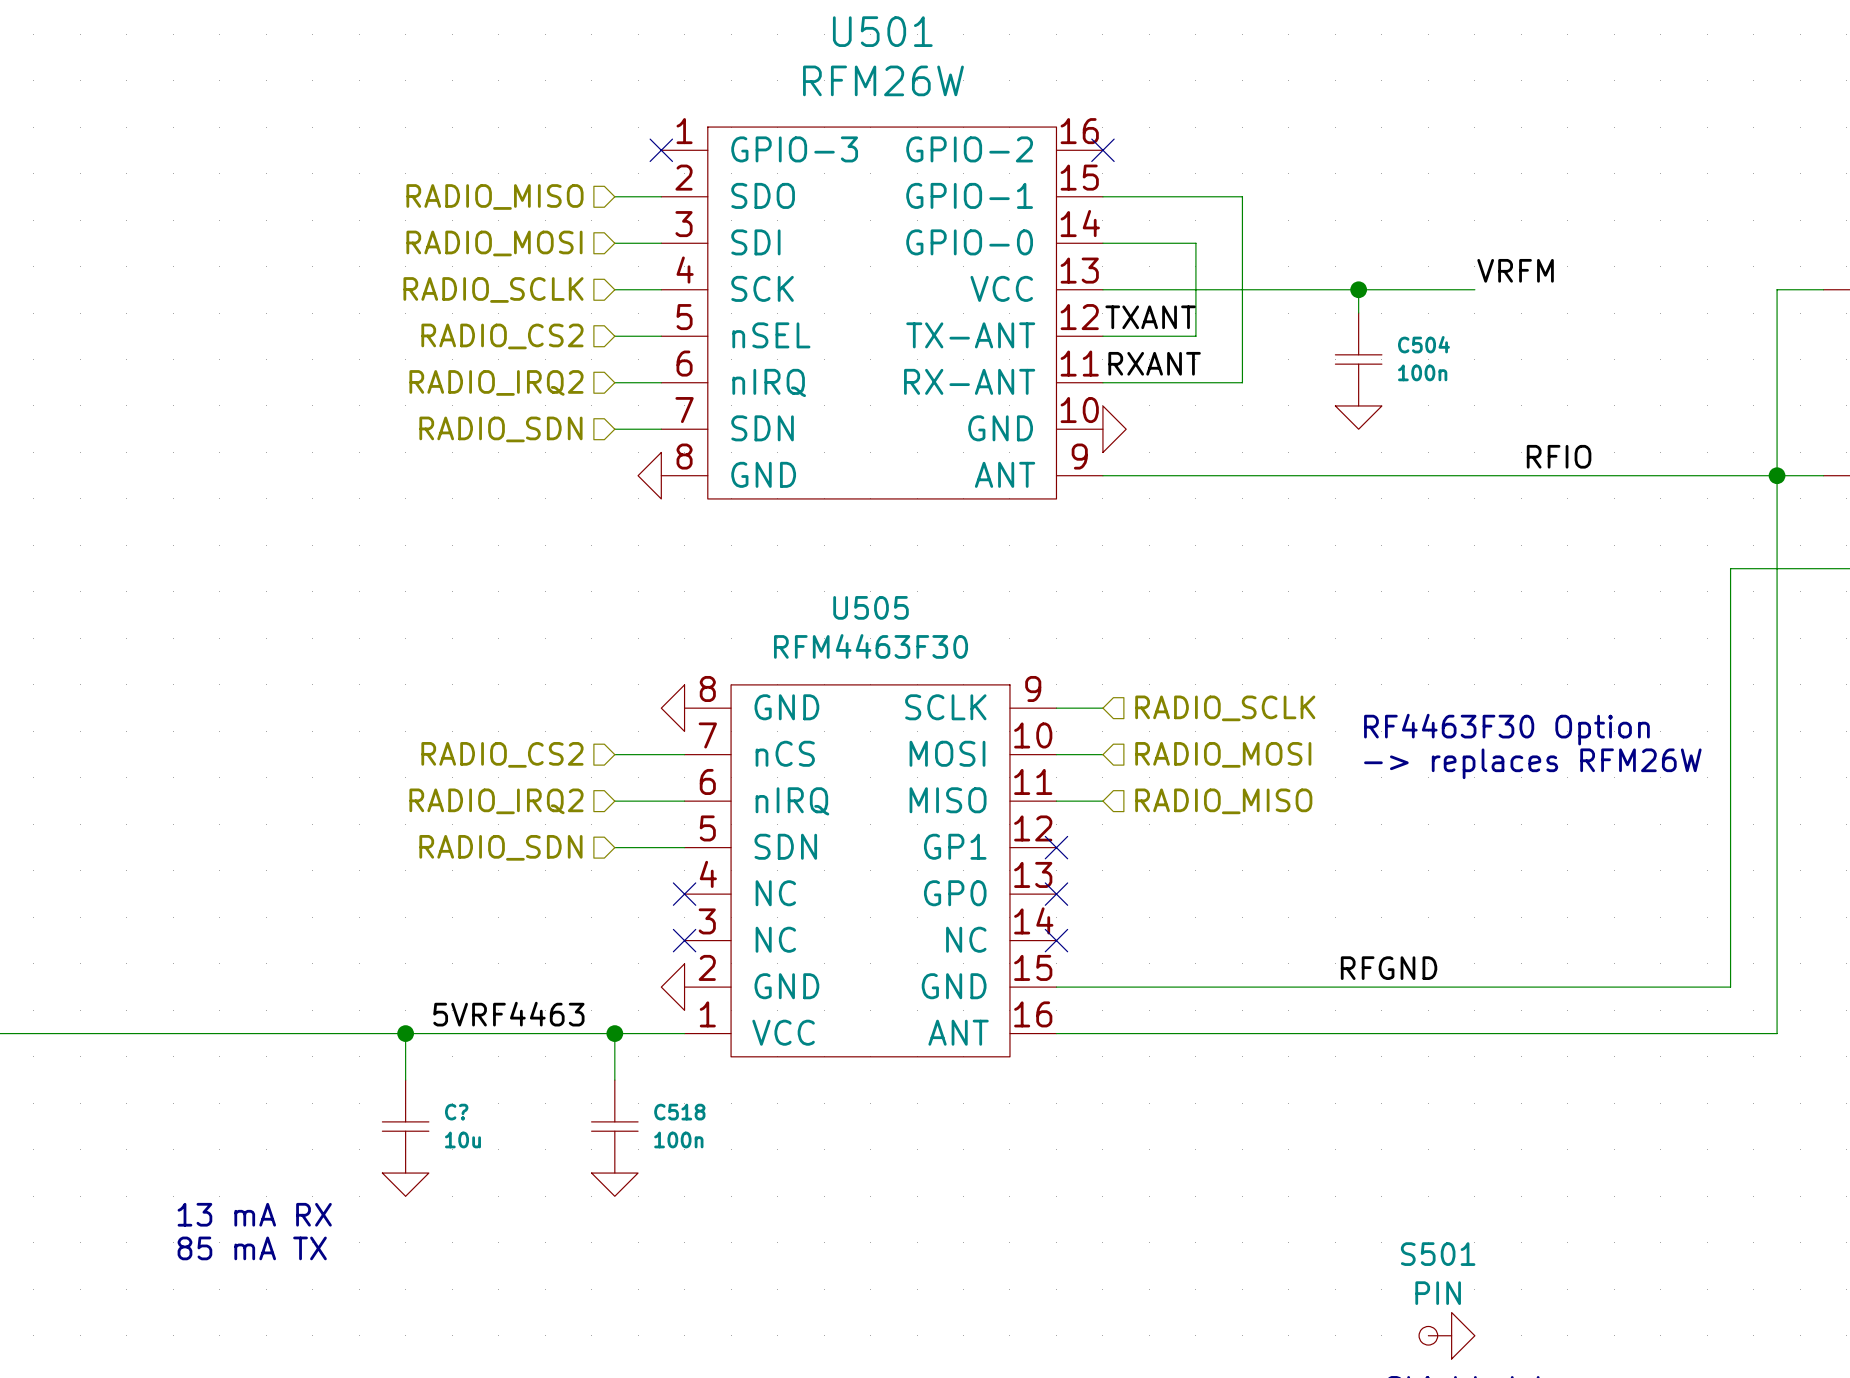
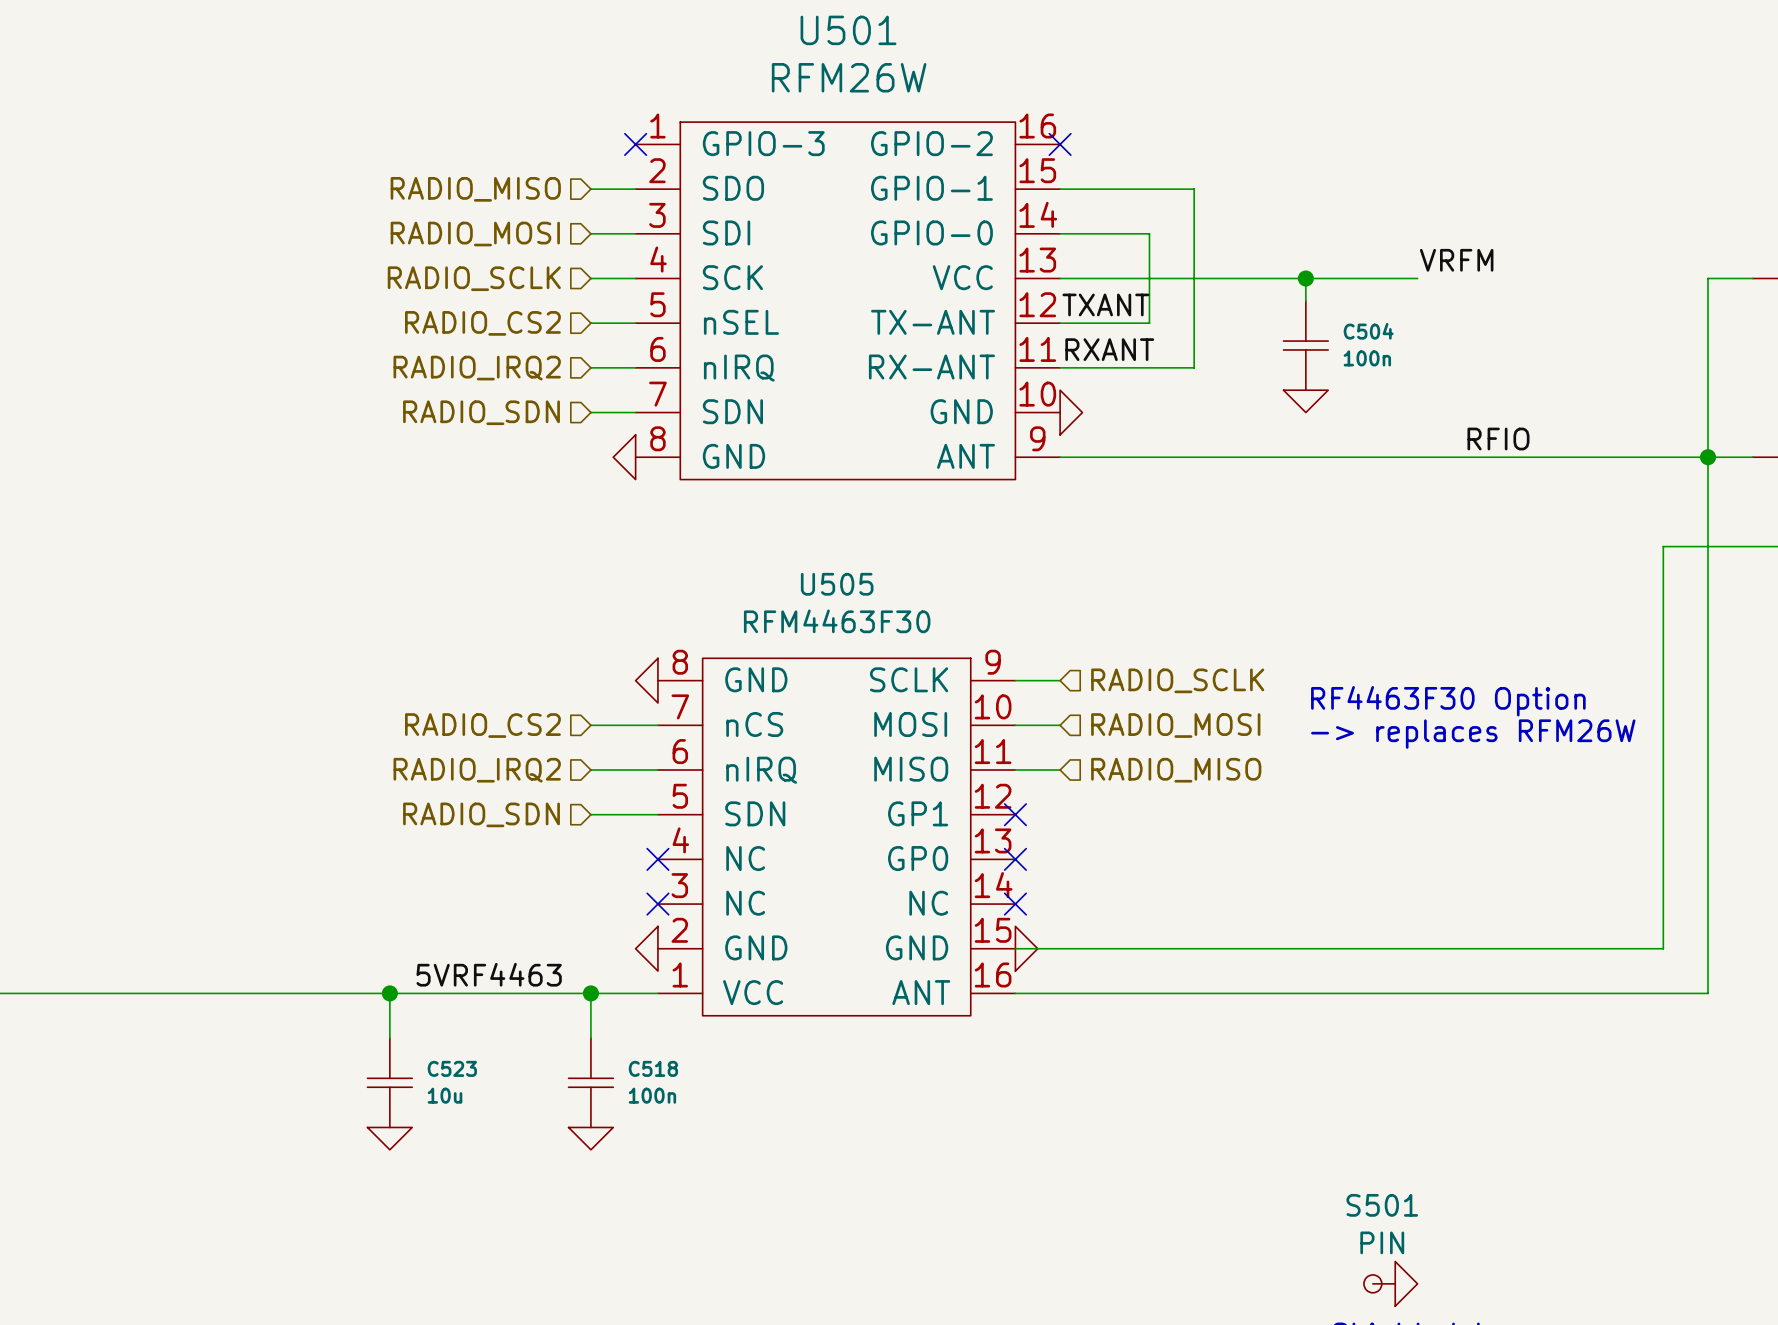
label: RFGND (1389, 968) -> none
power symbol: none -> (1026, 948)
C? name: C? (456, 1112) -> C523 (452, 1068)
text: 13 mA RX (254, 1214) -> none
text: 85 mA TX (252, 1248) -> none

